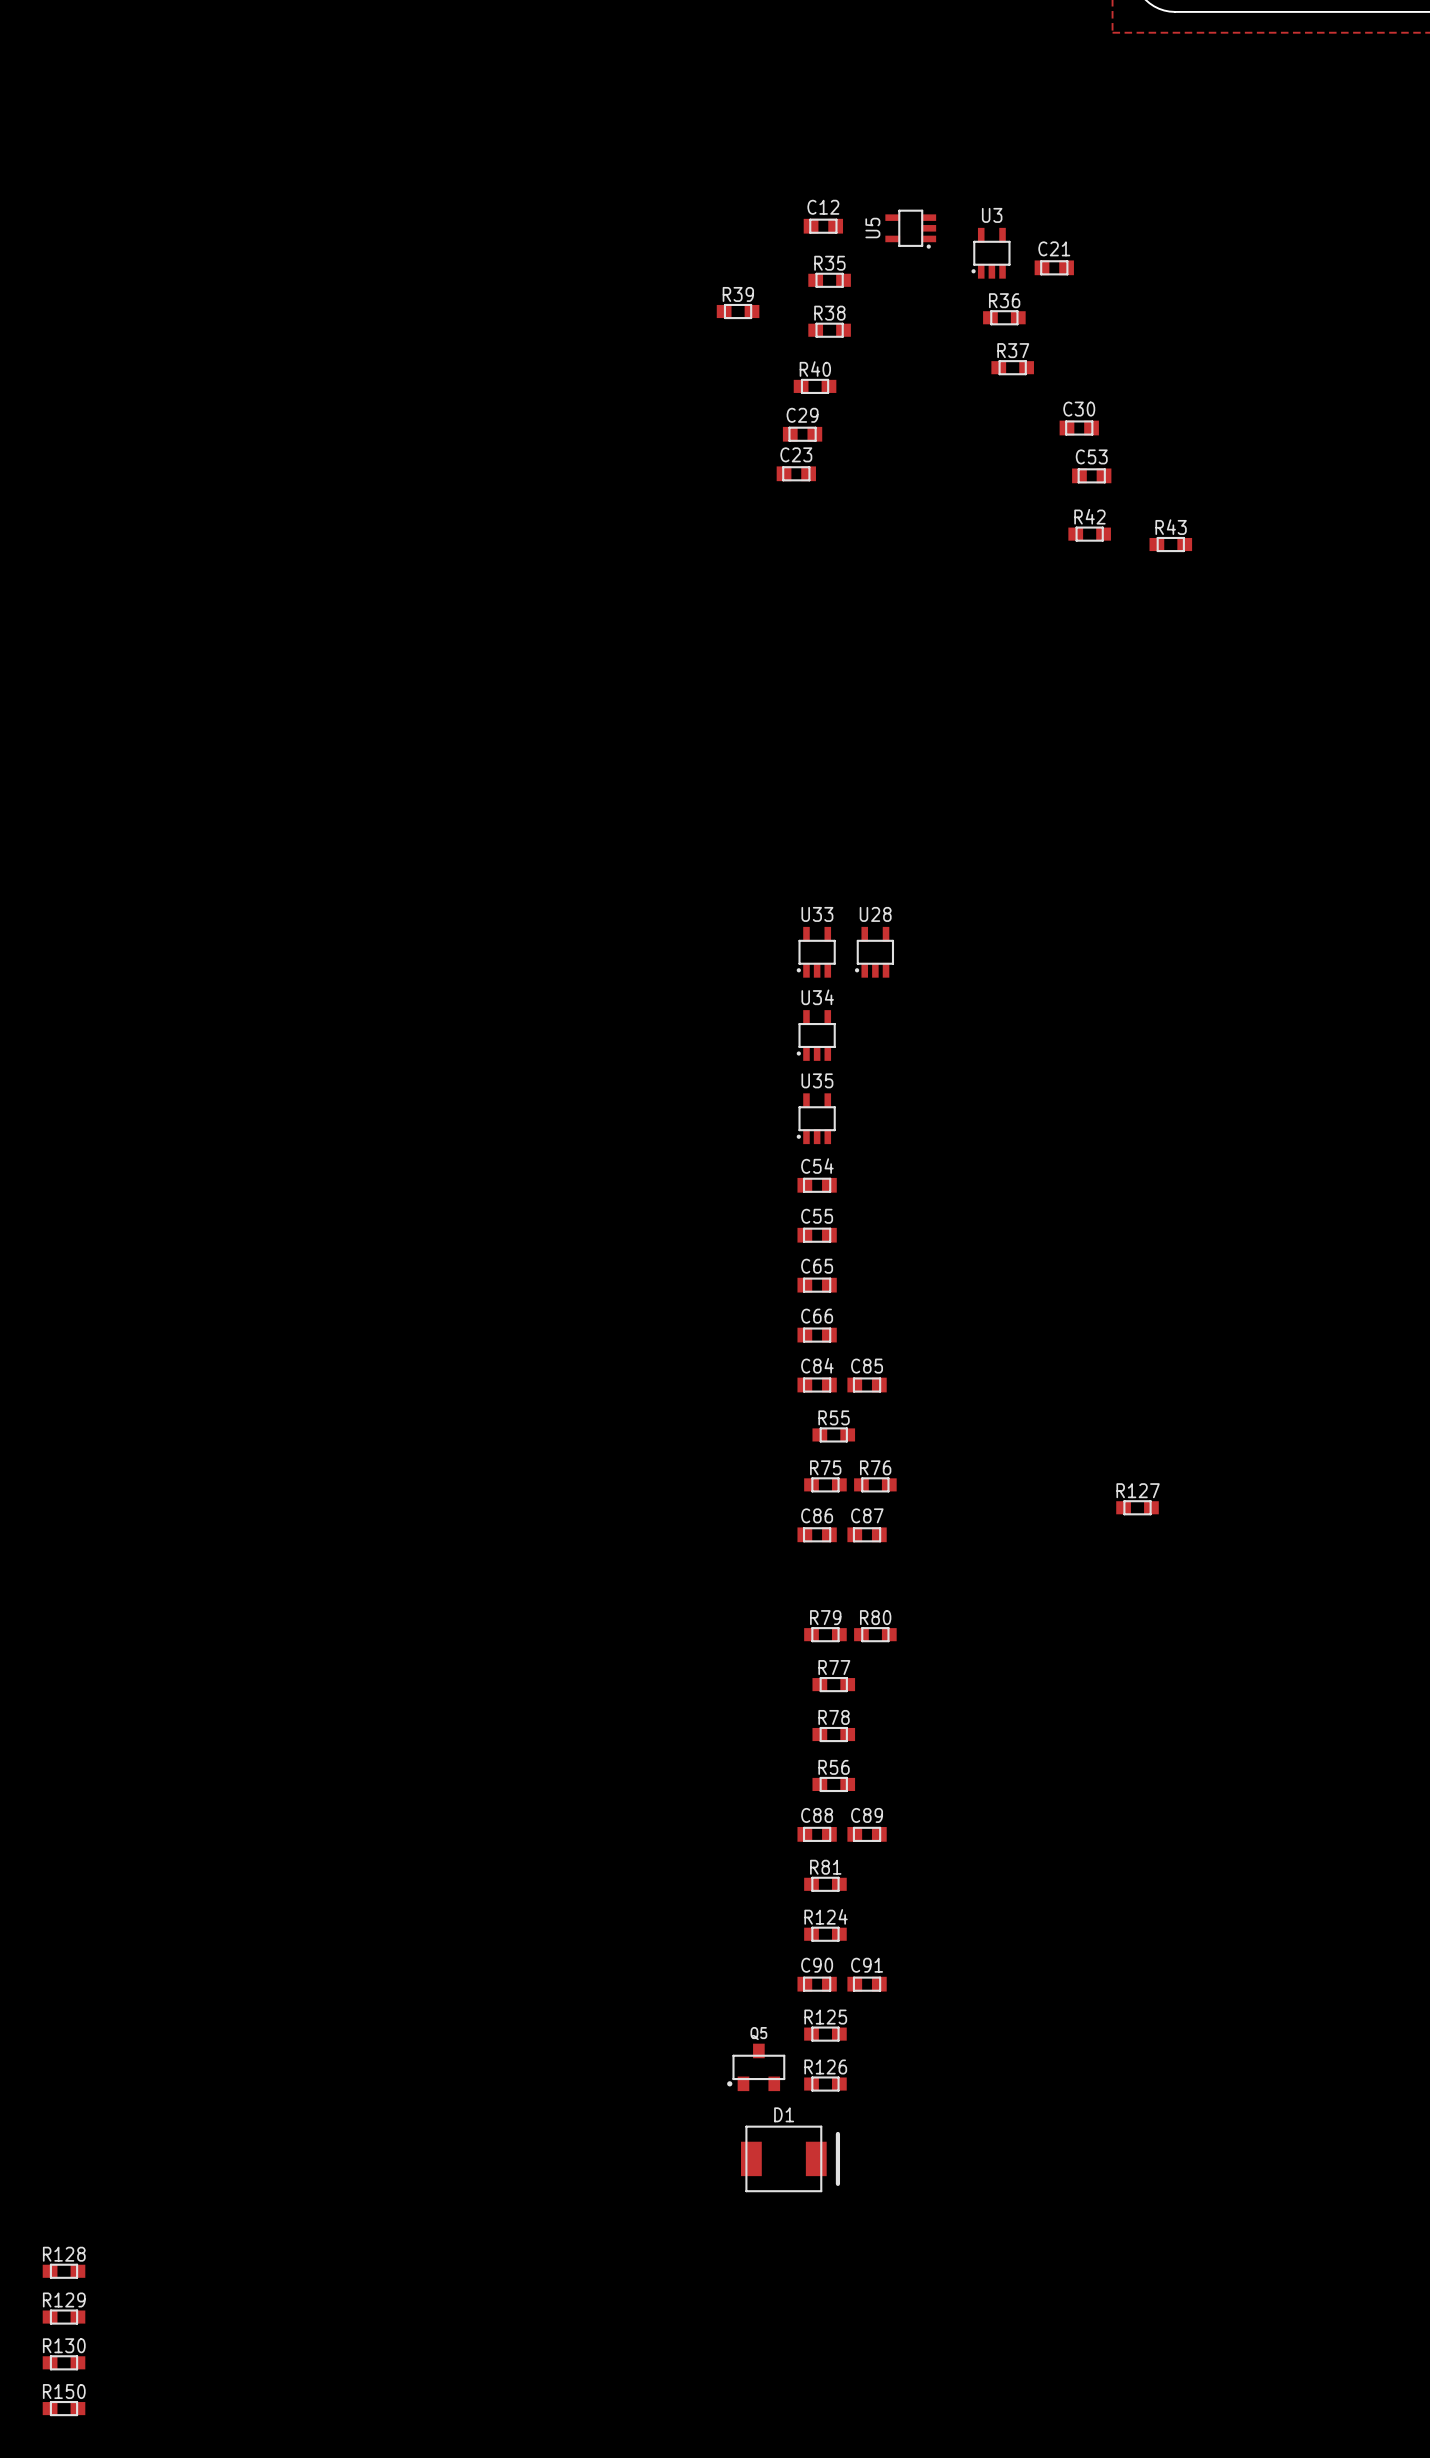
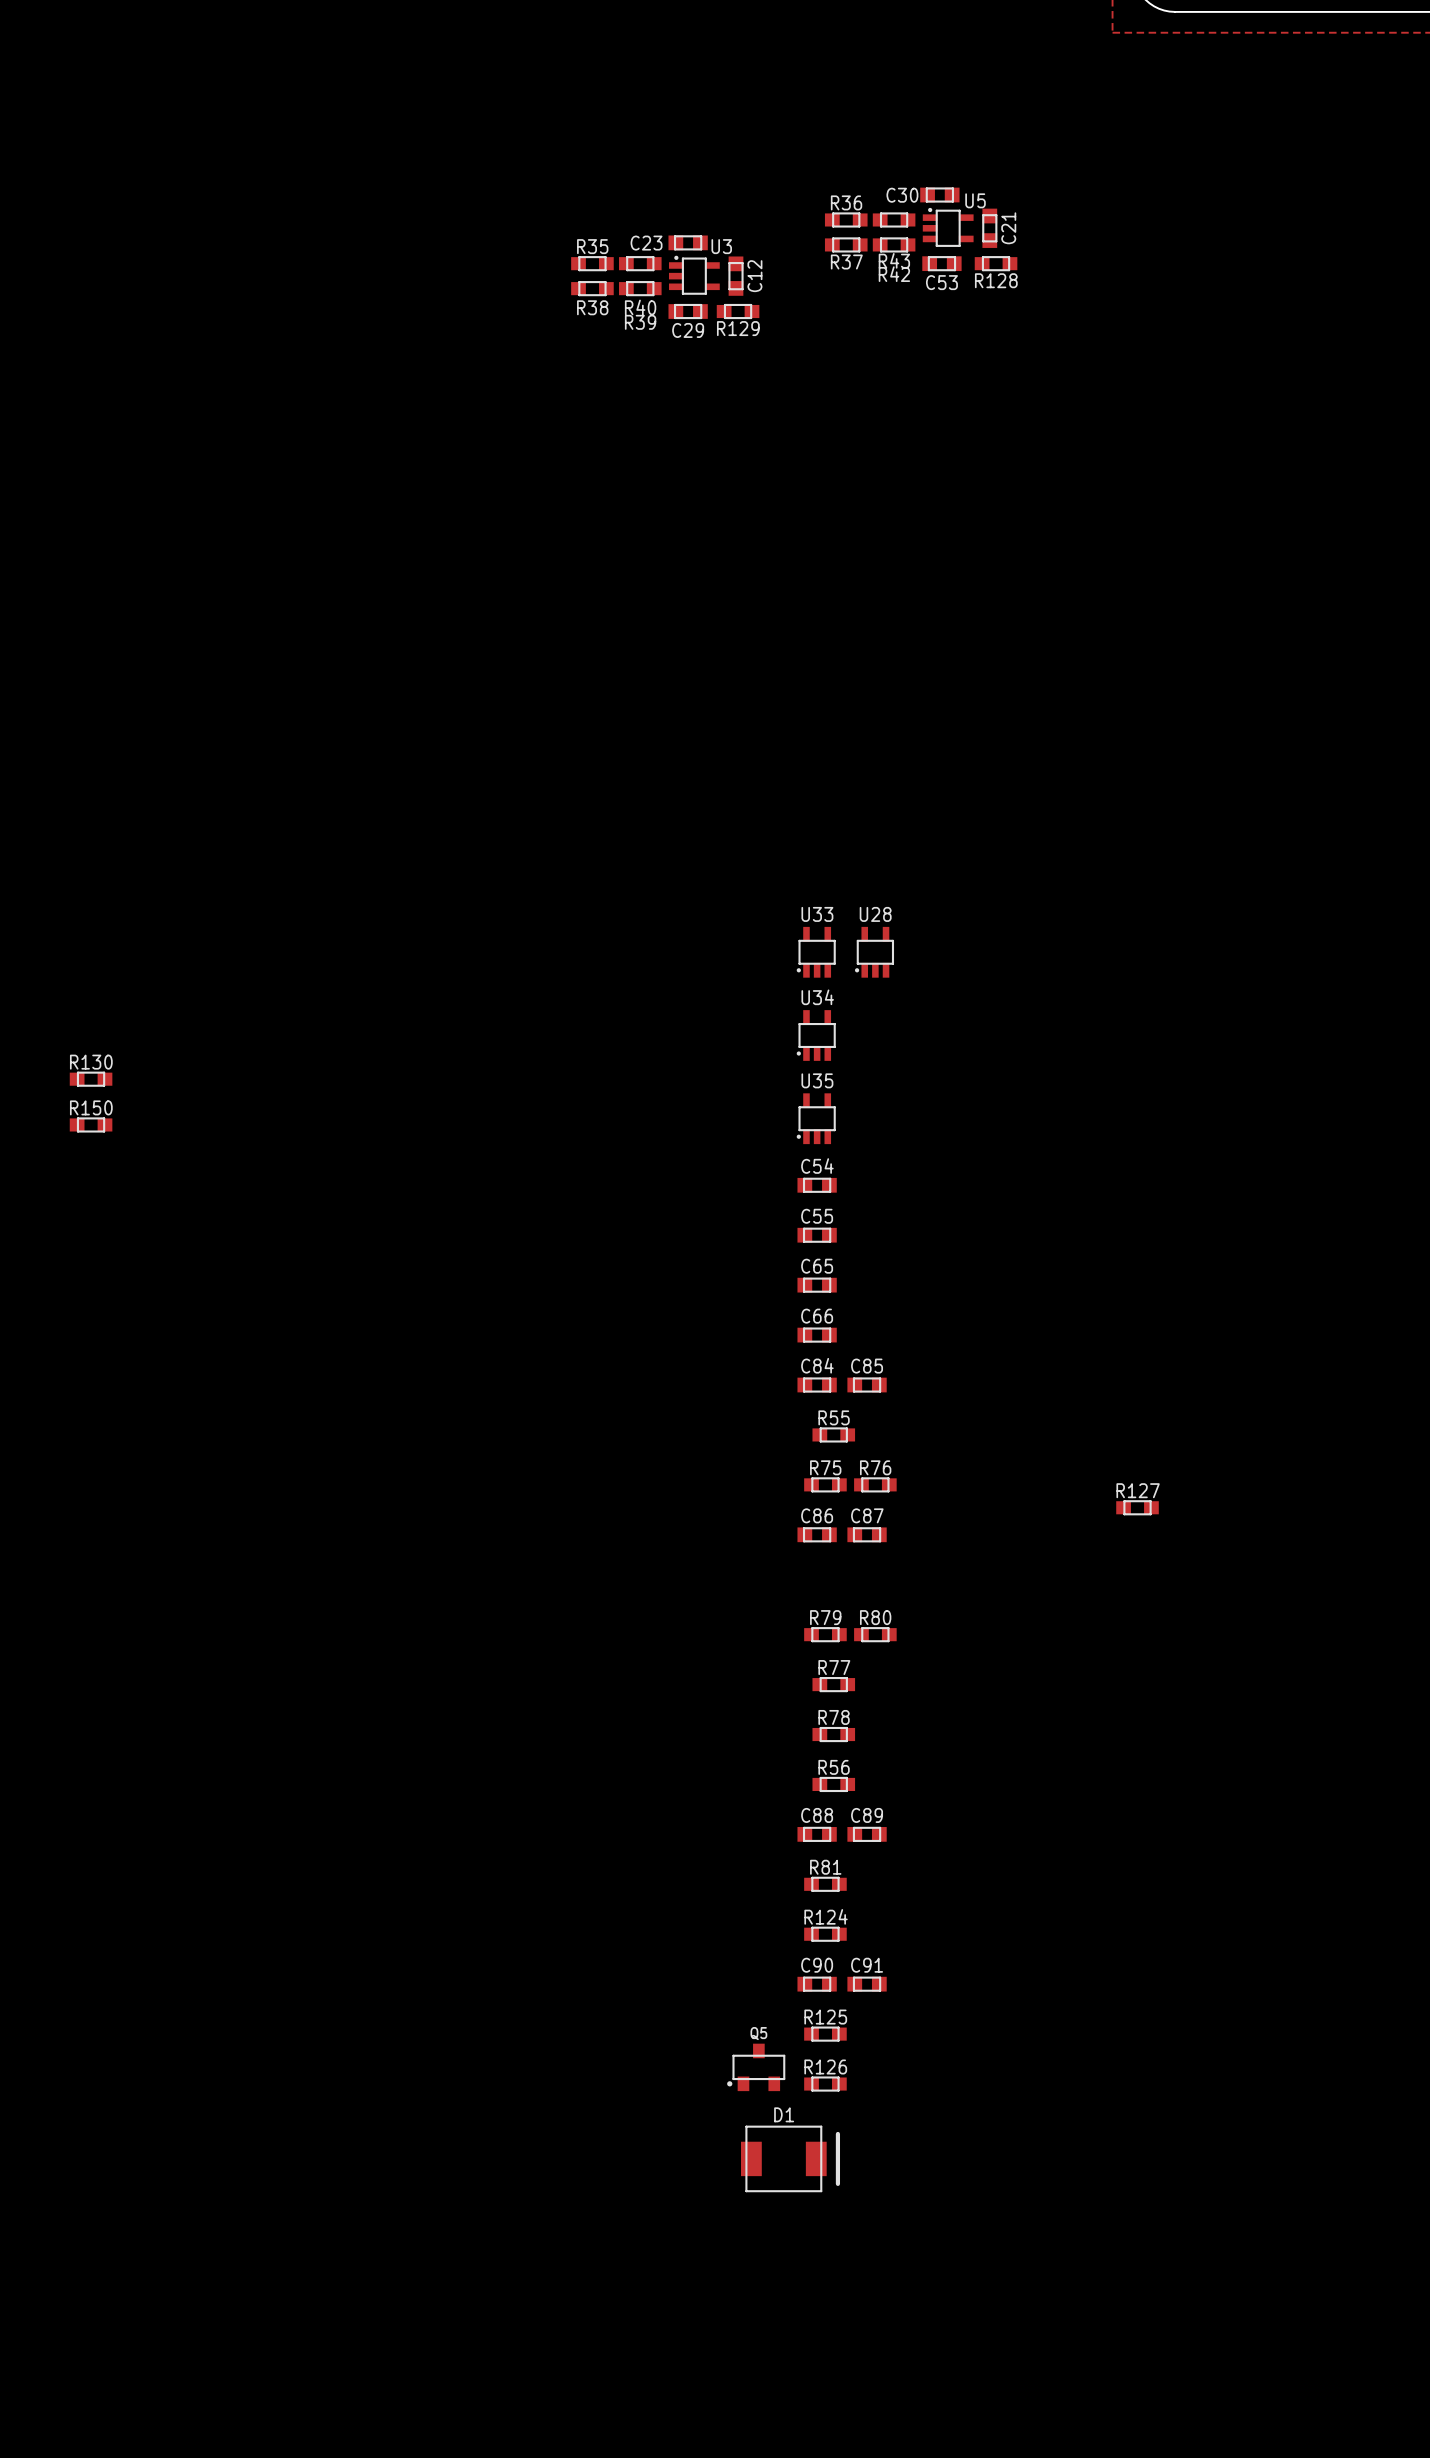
C12 rotation: 0° (823, 226) -> 90° clockwise (735, 276)
C12 position: (823, 226) -> (735, 276)
U5 rotation: 0° (910, 229) -> 180° (948, 227)
U5 position: (910, 229) -> (948, 227)
U3 rotation: 0° (991, 253) -> 90° clockwise (694, 275)
U3 position: (991, 253) -> (694, 275)
C21 rotation: 0° (1054, 267) -> 90° clockwise (989, 228)
C21 position: (1054, 267) -> (989, 228)
R35 position: (829, 280) -> (592, 263)
R39: none -> (640, 288)
R39 name: R39 (738, 294) -> R129 (738, 328)
R38 name position: R38 (829, 313) -> R38 (592, 307)
R36 position: (1004, 317) -> (846, 219)
R38 position: (829, 330) -> (592, 288)
R37 name position: R37 (1013, 350) -> R37 (846, 261)
R37 position: (1012, 367) -> (846, 244)
R40 name position: R40 (815, 369) -> R40 (640, 307)
R40 position: (815, 386) -> (640, 263)
C30 name position: C30 (1079, 409) -> C30 (902, 195)
C29 name position: C29 (802, 415) -> C29 (688, 330)
C30 position: (1079, 428) -> (939, 195)
C29 position: (802, 434) -> (688, 311)
C23 name position: C23 (796, 454) -> C23 (646, 243)
C53 name position: C53 (1091, 456) -> C53 (941, 282)
C23 position: (796, 473) -> (688, 242)
C53 position: (1091, 475) -> (941, 263)
R42 name position: R42 (1089, 516) -> R42 (894, 274)
R43 name position: R43 (1171, 527) -> R43 (894, 260)
R42 position: (1089, 534) -> (894, 244)
R43 position: (1170, 544) -> (894, 219)
R128 name position: R128 (64, 2254) -> R128 (996, 280)
R128 position: (64, 2271) -> (996, 263)
R129: (64, 2317) -> none
R130 position: (64, 2362) -> (91, 1079)
R150 position: (64, 2408) -> (91, 1124)

